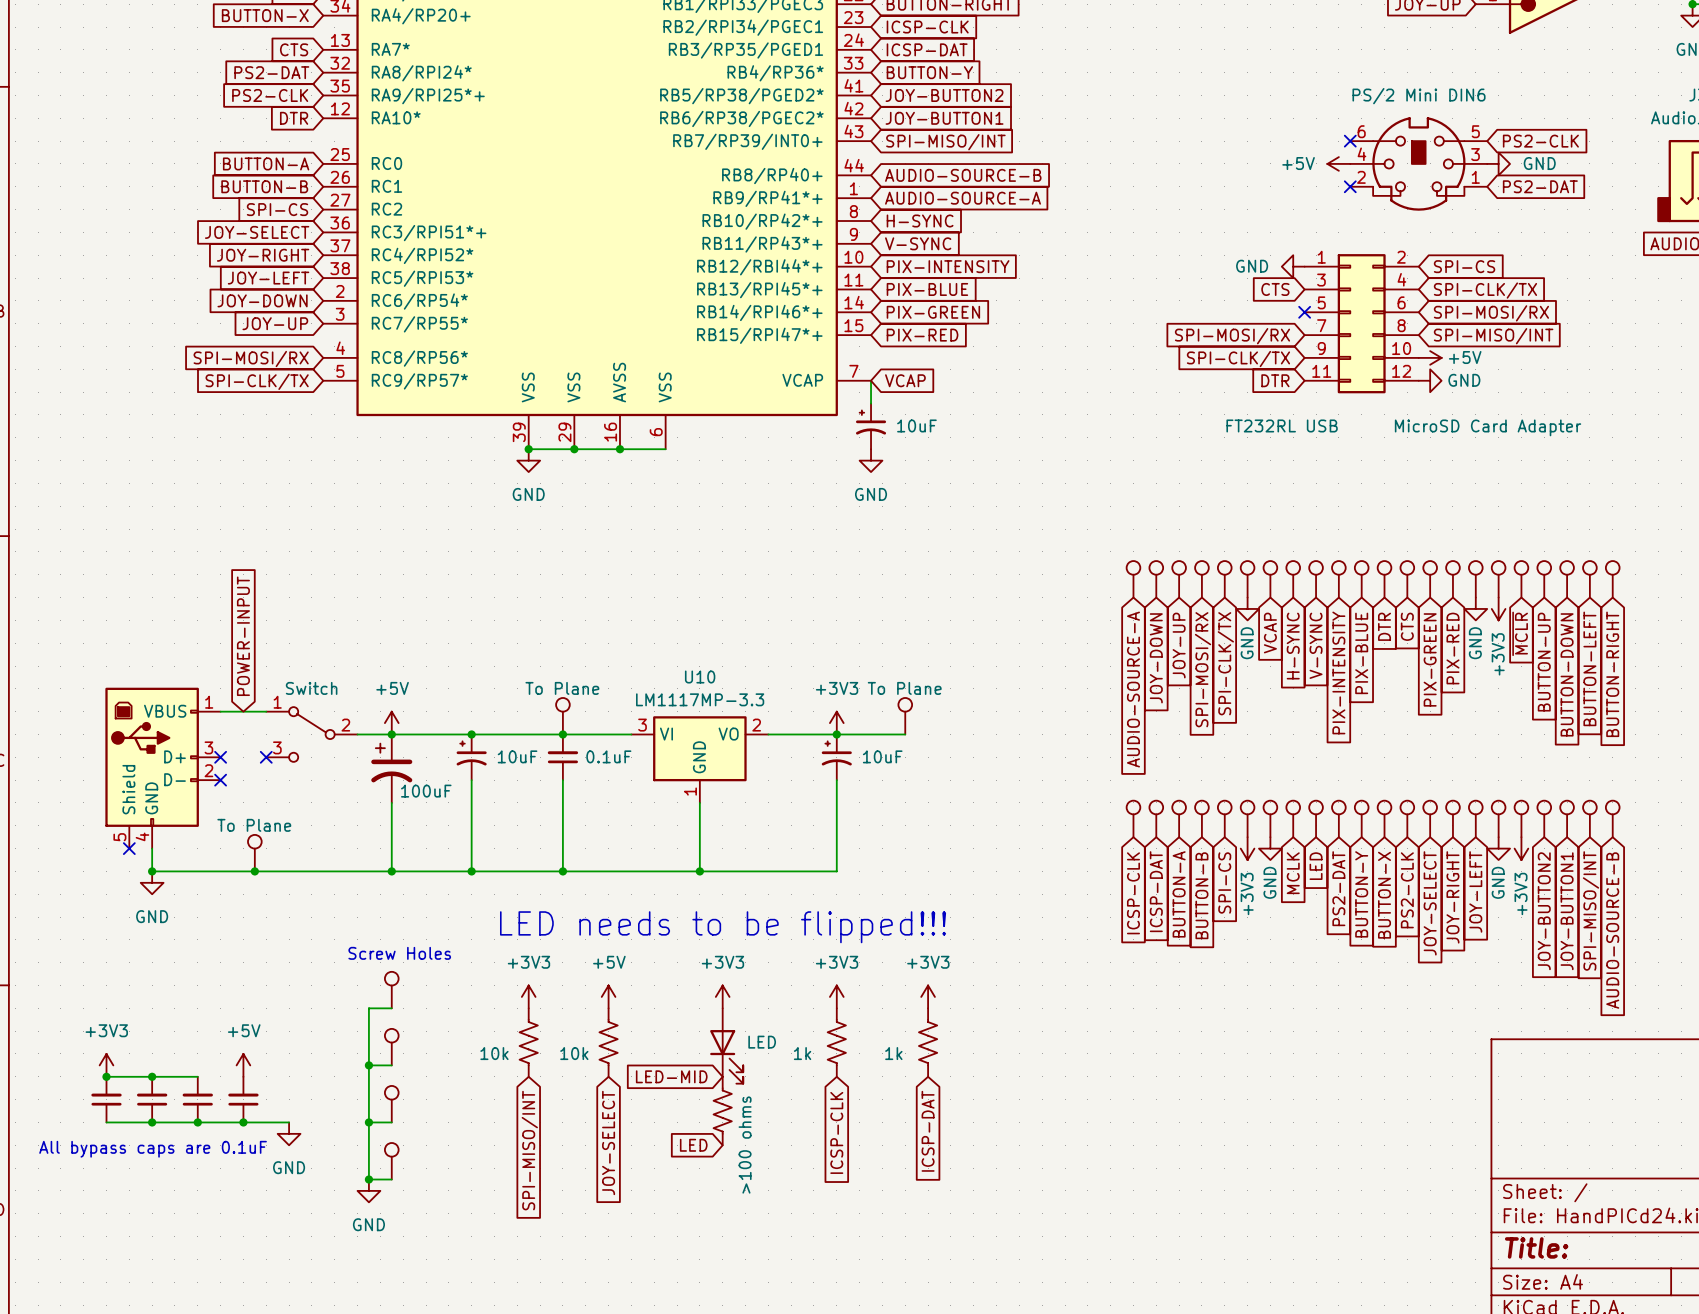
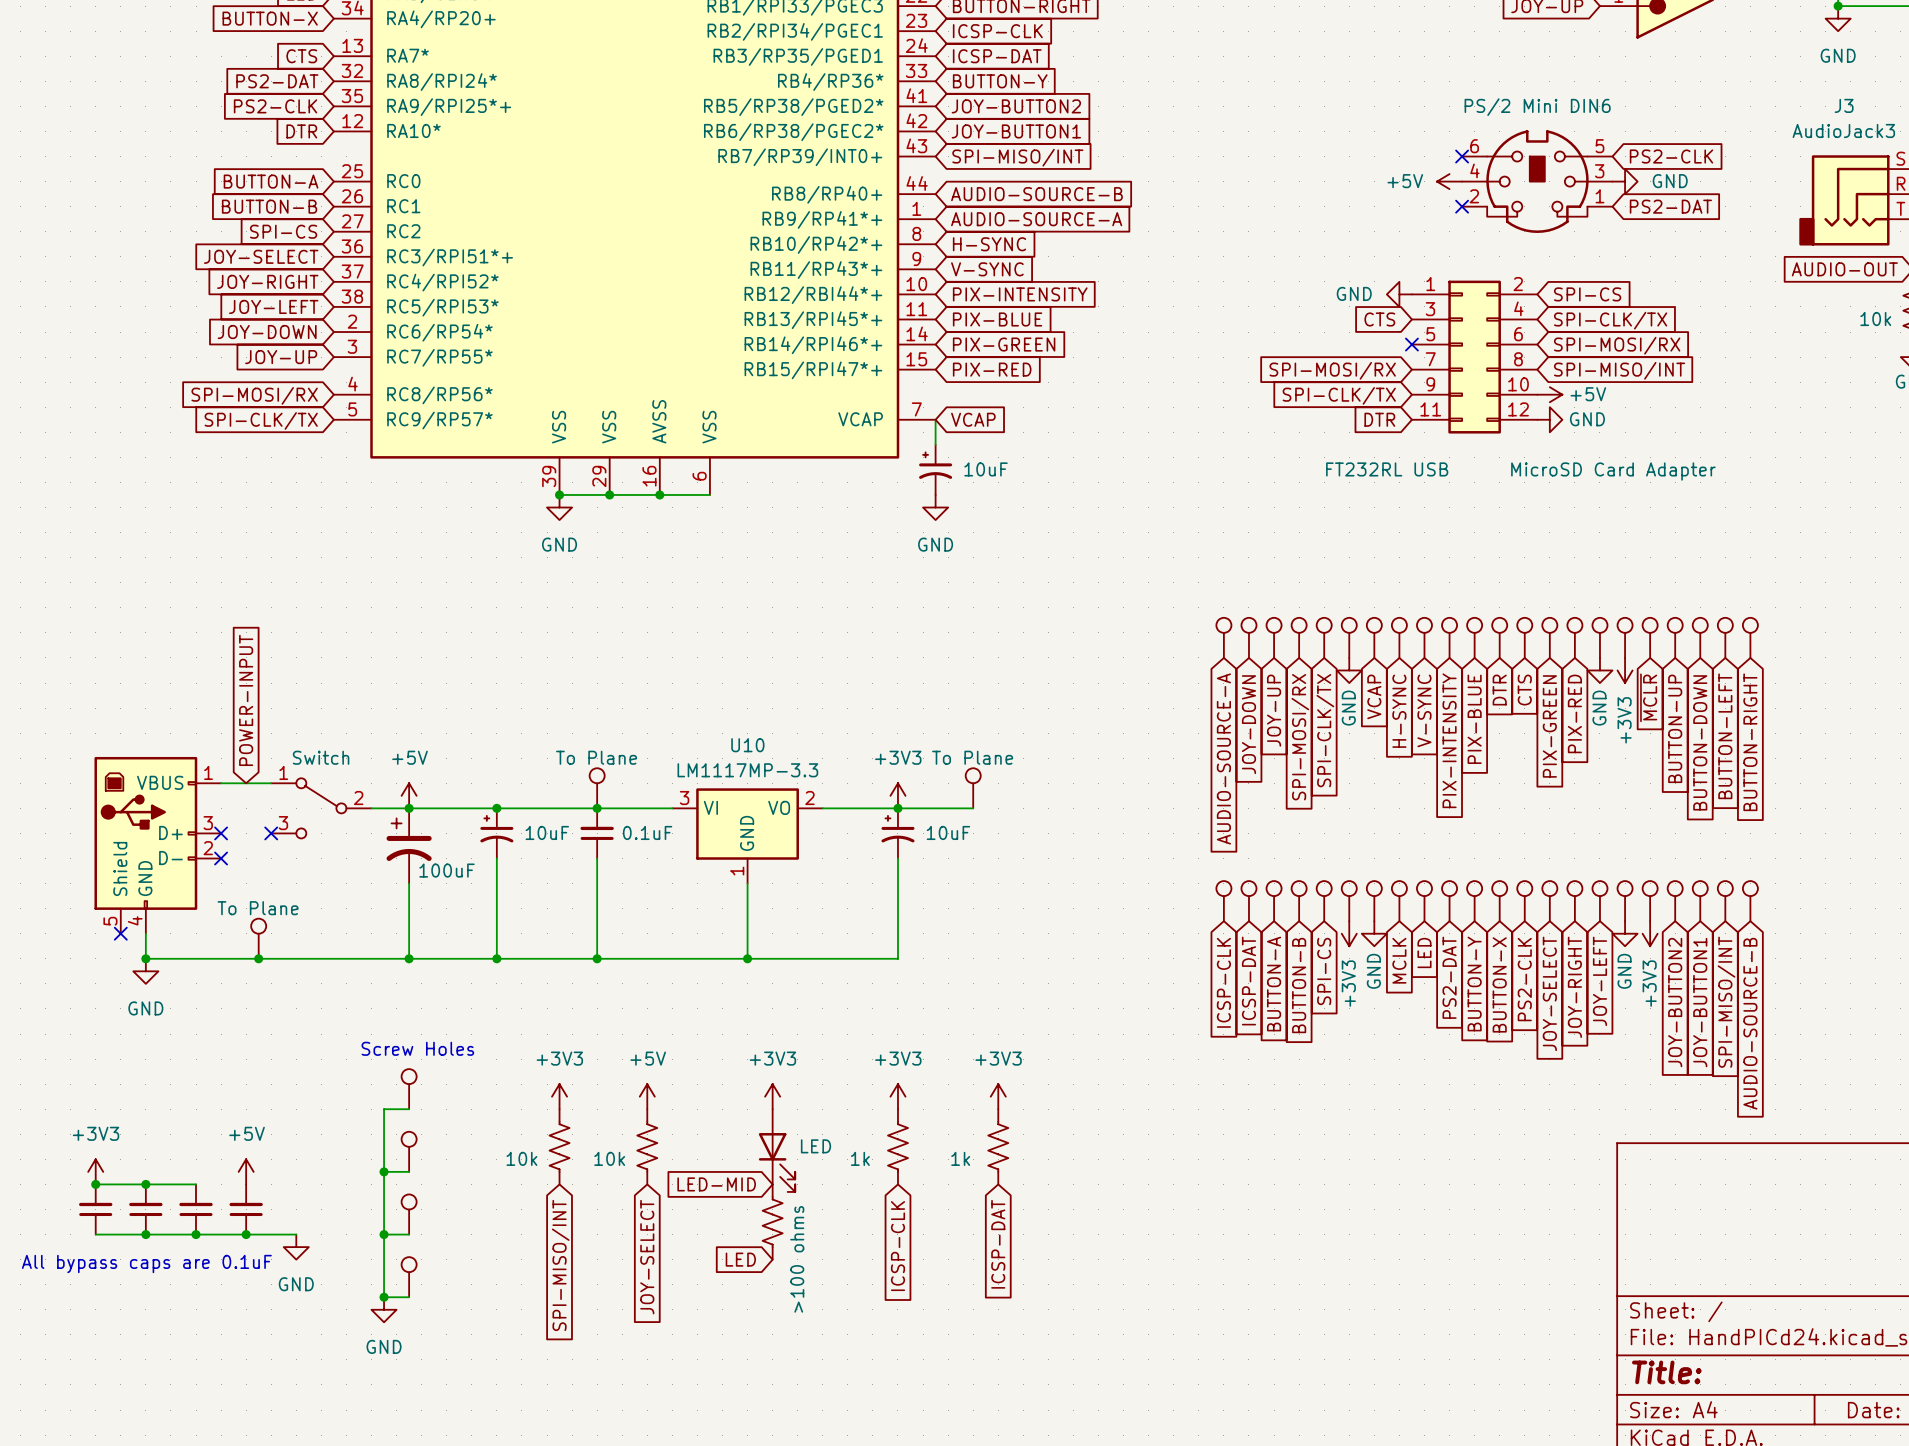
text: LED needs to be flipped!!! (723, 927) -> none

